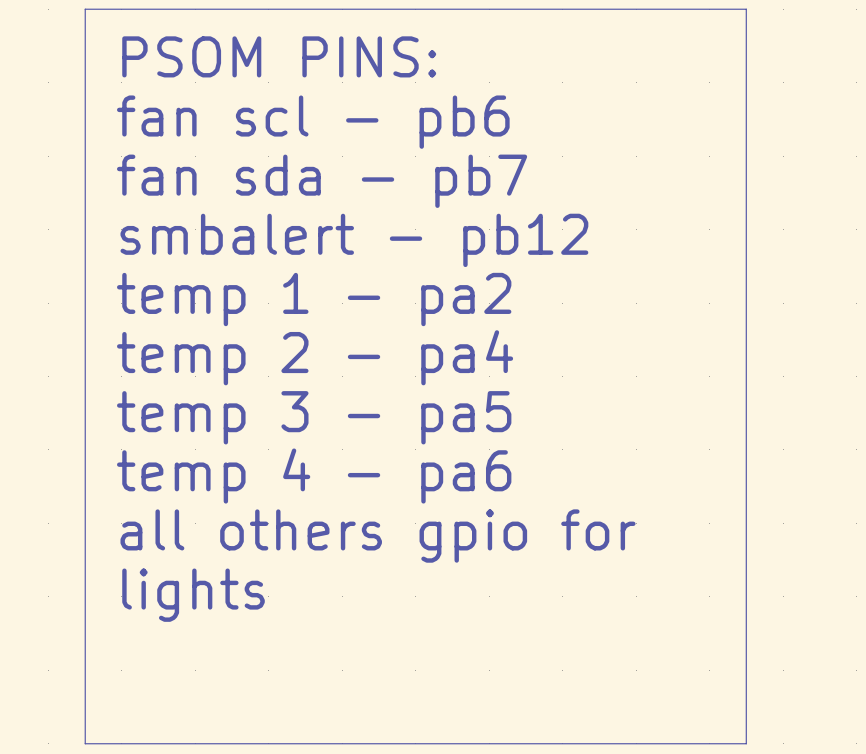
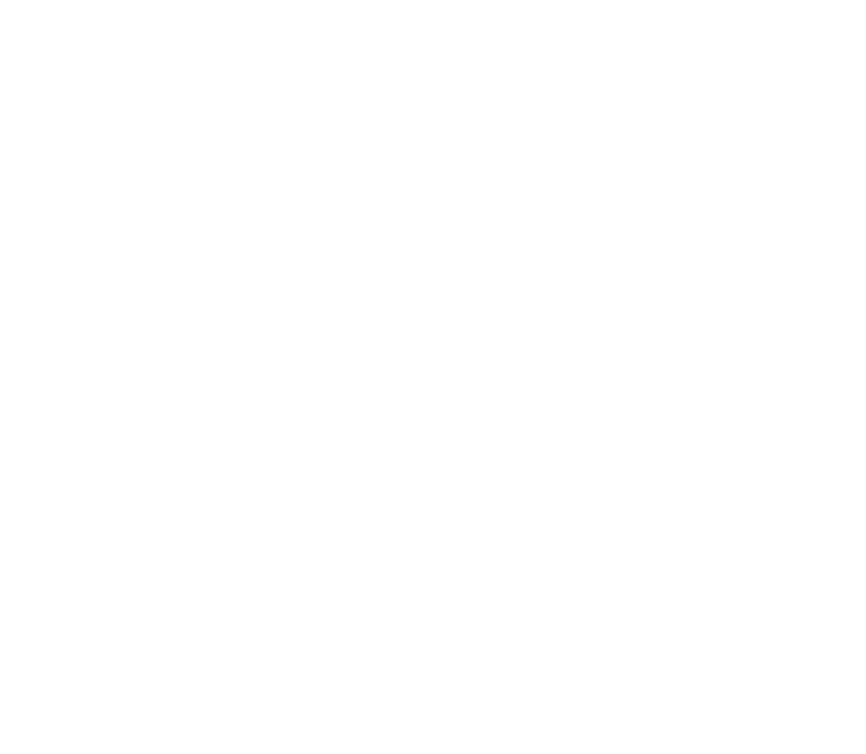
line: (85, 9) (746, 9) (746, 743) (85, 743) (85, 9) -> none
text: PSOM PINS: (279, 56) -> none
text: fan scl - pb6 (313, 122) -> none
text: fan sda - pb7 (322, 181) -> none
text: smbalert - pb12 (354, 240) -> none
text: temp 1 - pa2 (314, 299) -> none
text: temp 2 - pa4 (315, 357) -> none
text: temp 3 - pa5 (314, 417) -> none
text: temp 4 - pa6 (314, 476) -> none
text: all others gpio for (378, 536) -> none
text: lights (193, 595) -> none

